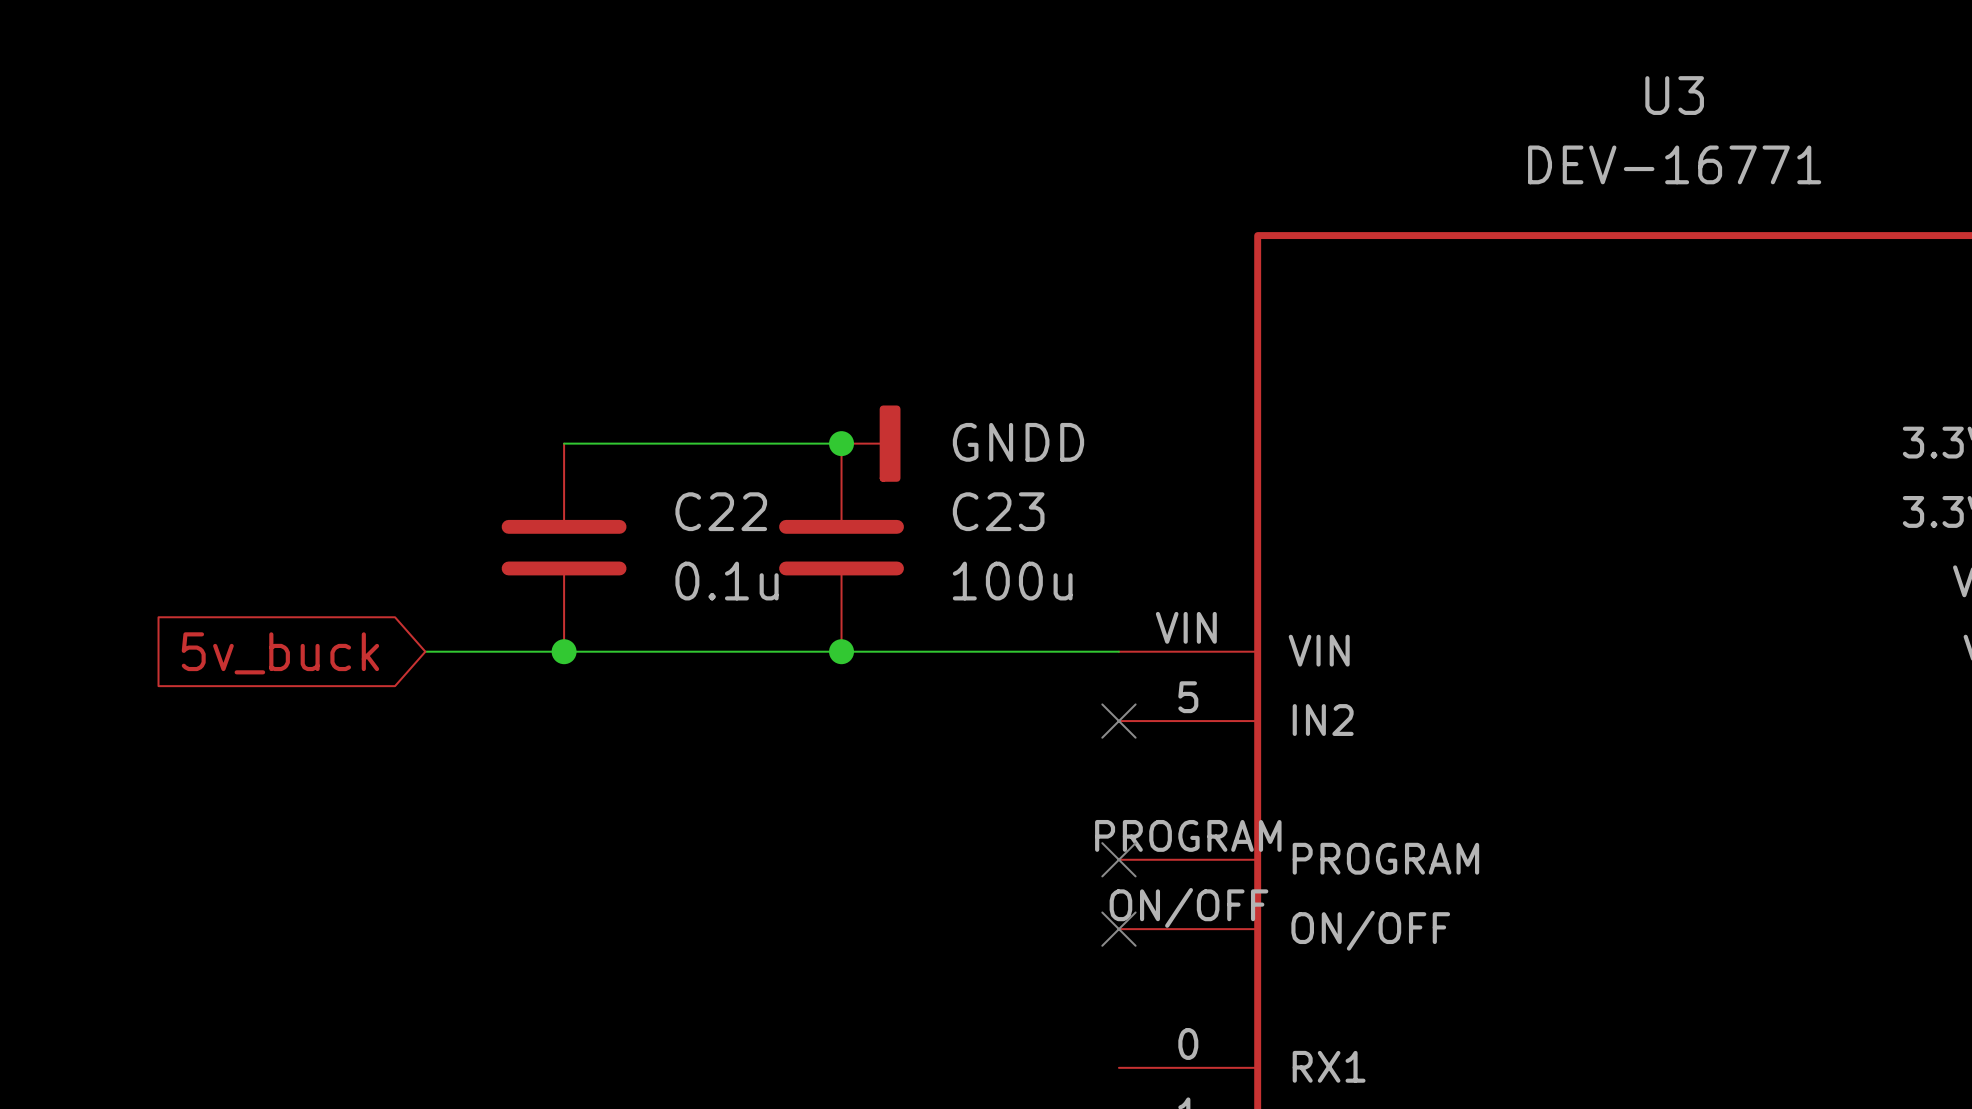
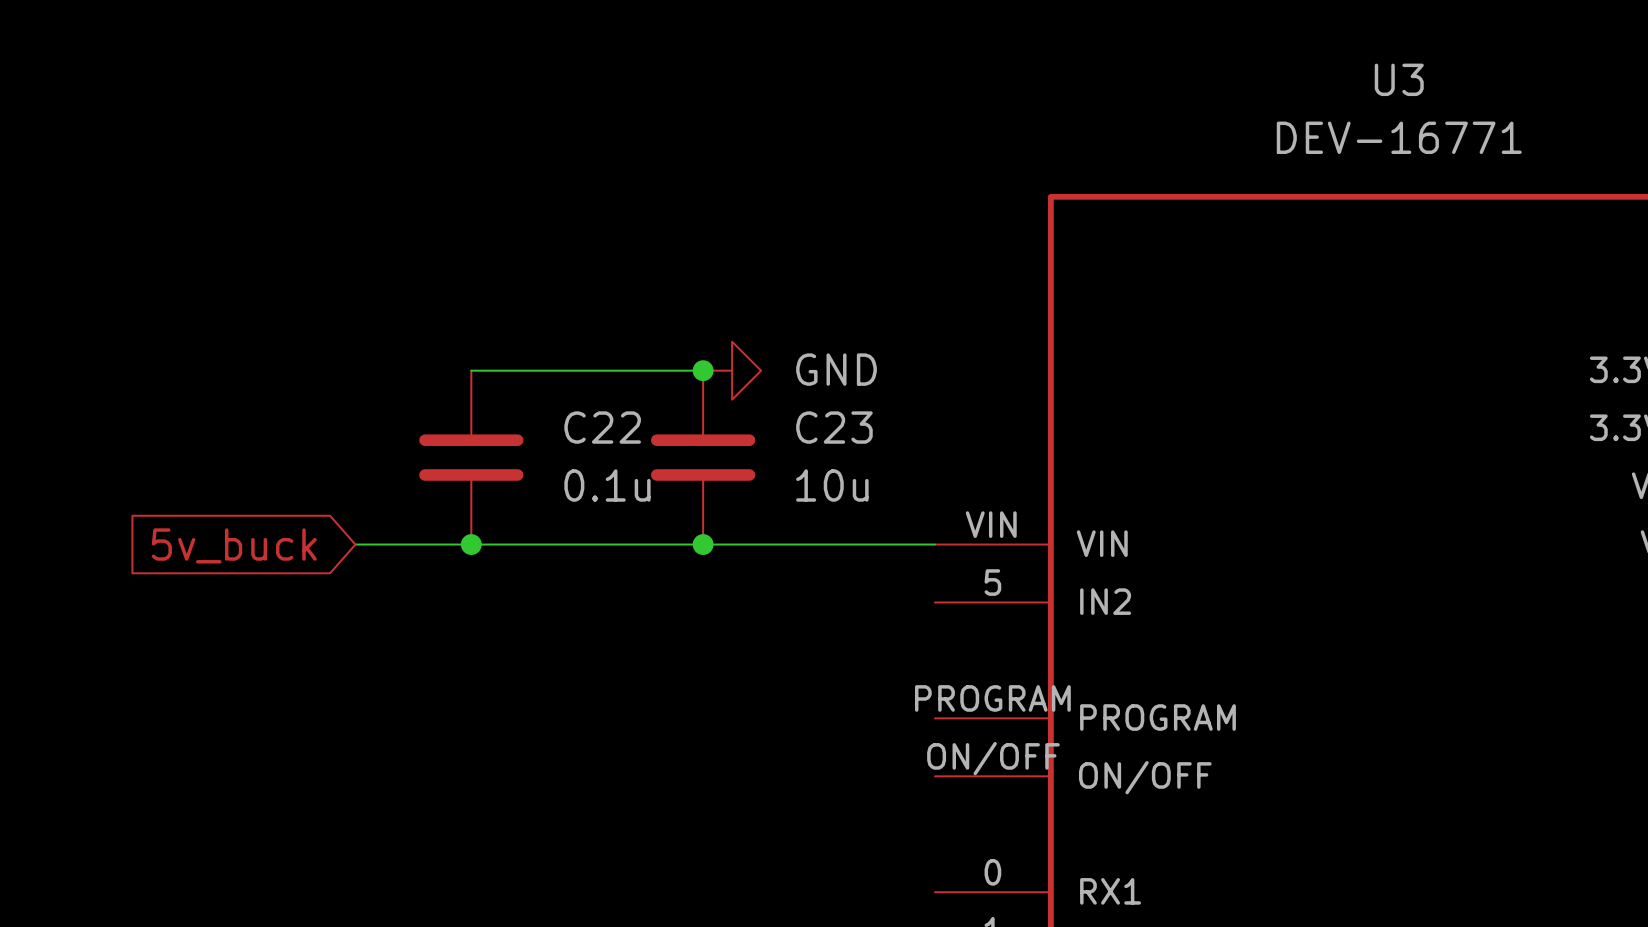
power symbol: GNDD (871, 443) -> GND (732, 370)
C23 value: 100u (1012, 581) -> 10u (832, 485)
no-connect mark: (1118, 721) -> none
no-connect mark: (1118, 859) -> none
no-connect mark: (1118, 929) -> none

